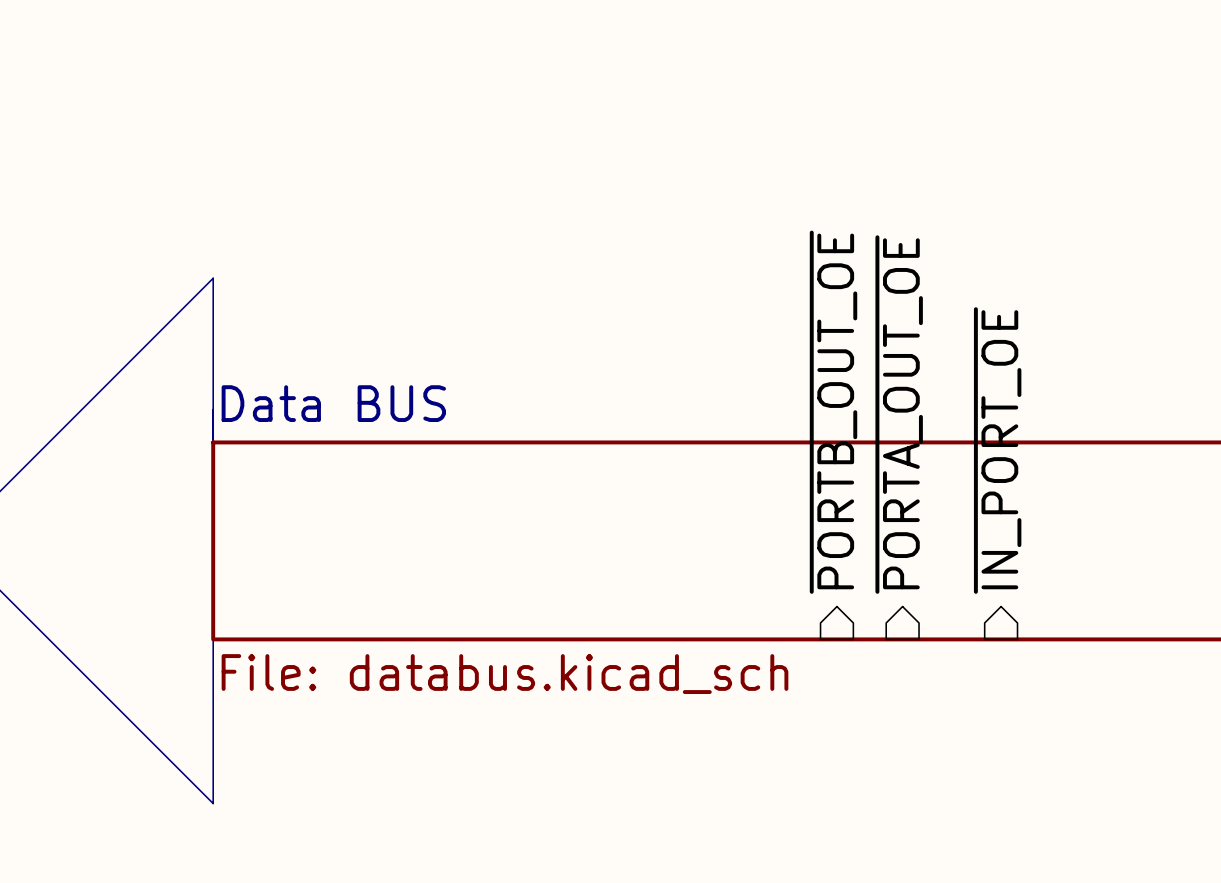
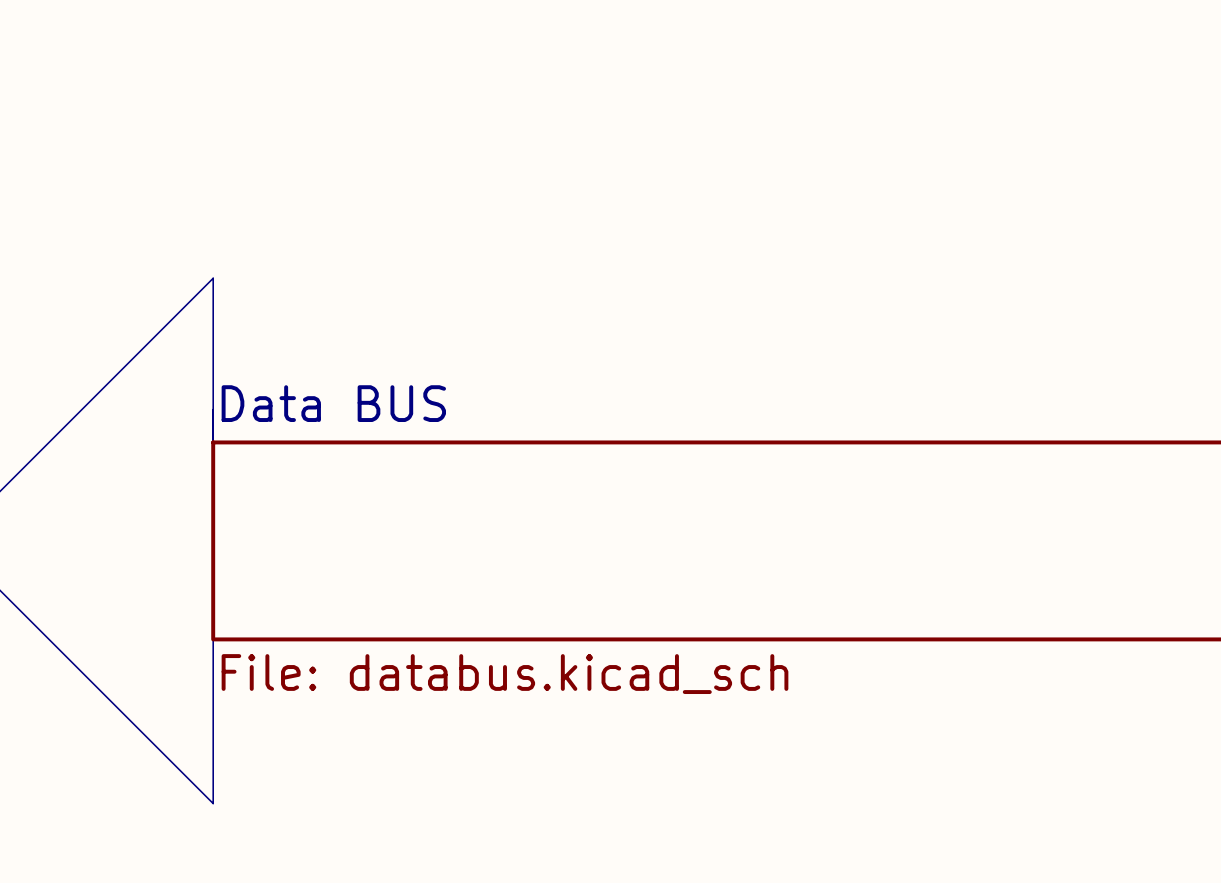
sheet pin: ~{PORTB_OUT_OE} (833, 412) -> none
sheet pin: ~{PORTA_OUT_OE} (899, 414) -> none
sheet pin: ~{IN_PORT_OE} (997, 450) -> none

